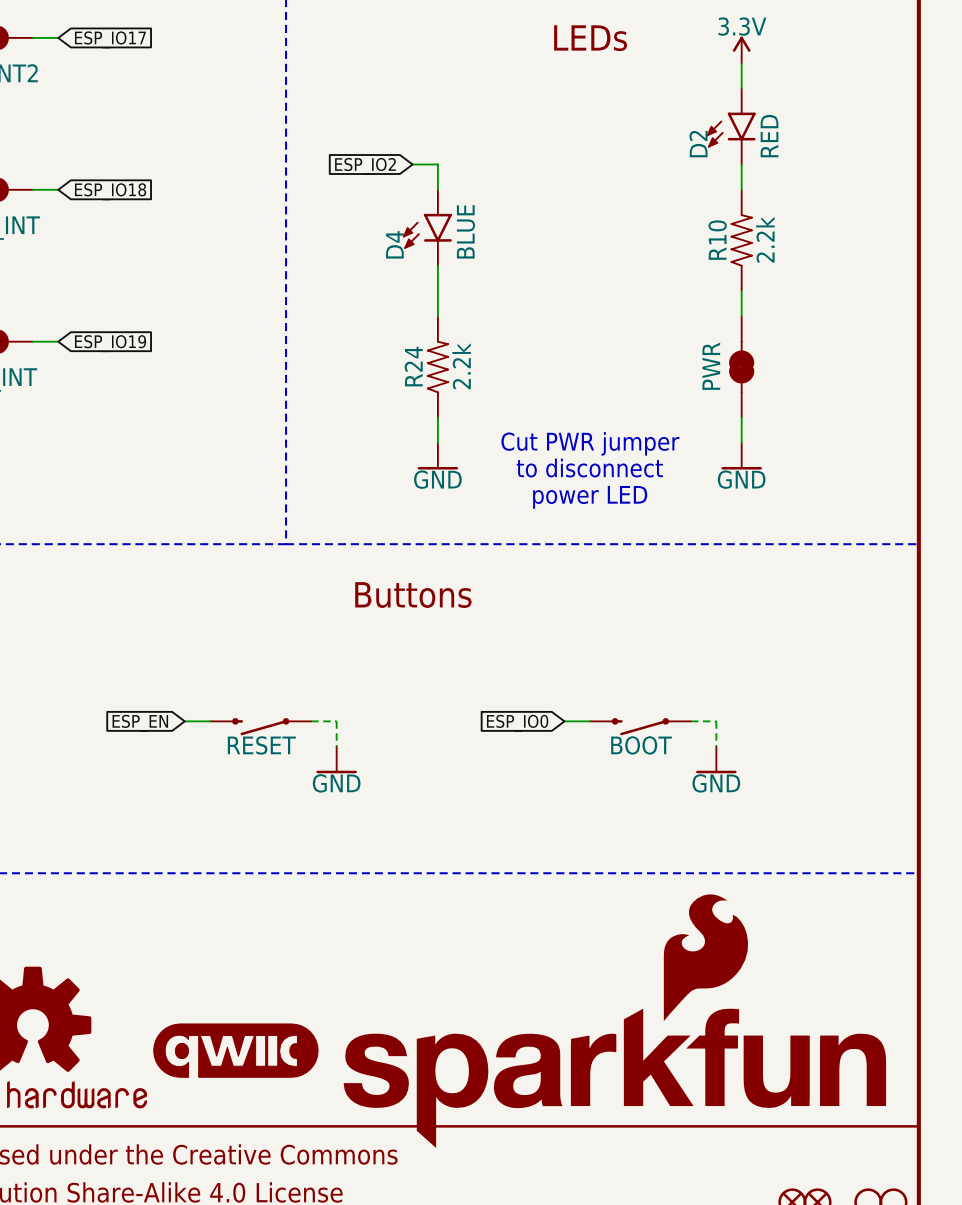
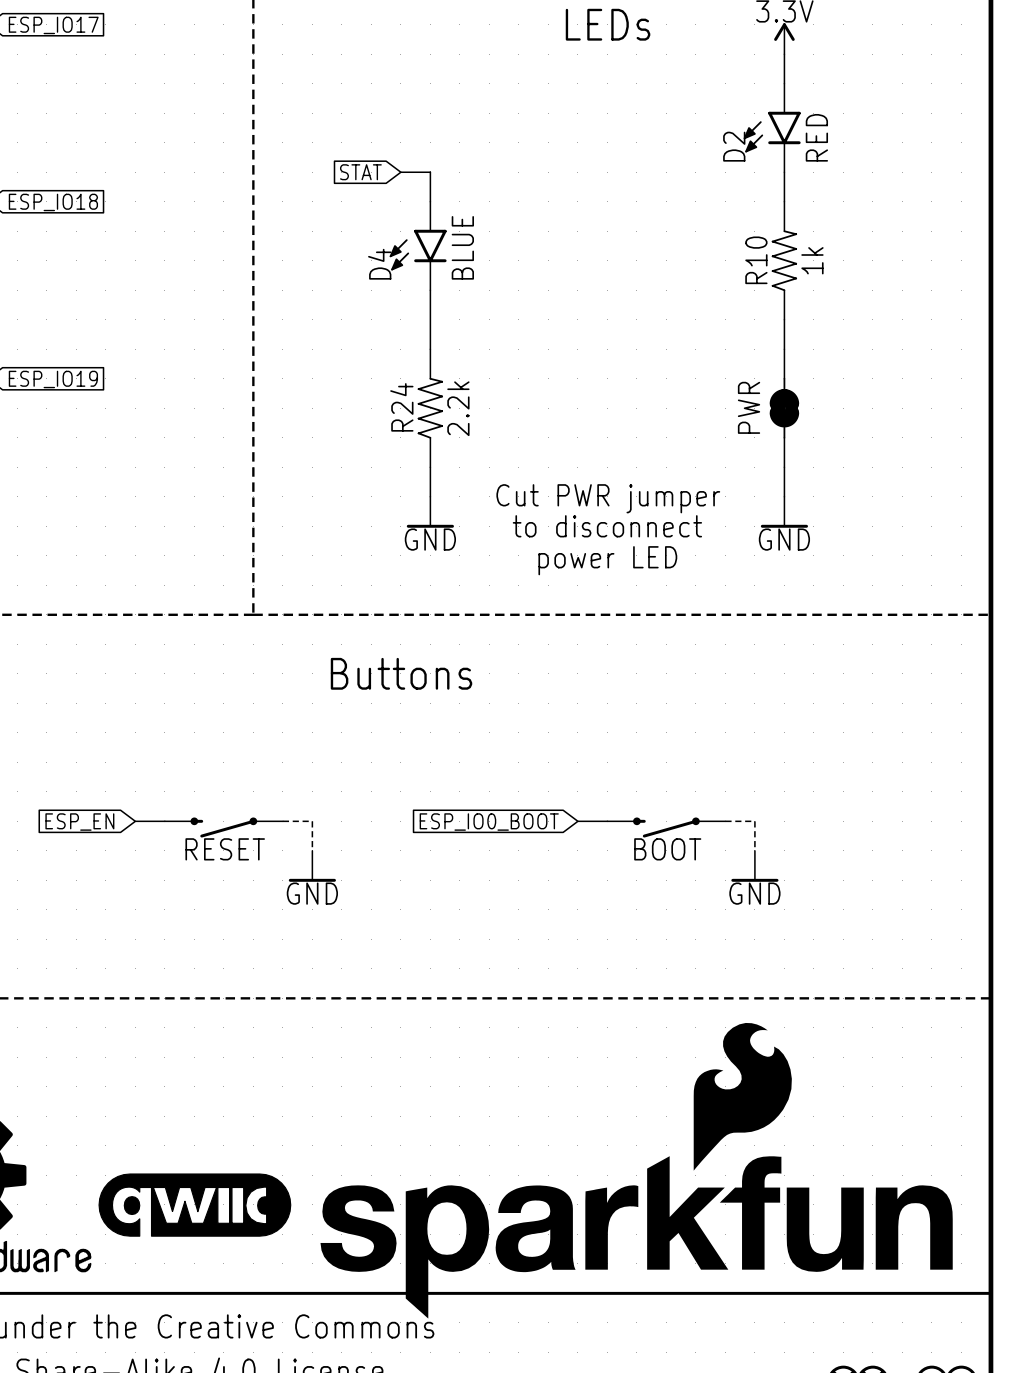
global label: ESP_IO2 (365, 166) -> STAT (360, 172)
R10 value: 2.2k (765, 239) -> 1k (812, 260)
global label: ESP_IO0 (517, 723) -> ESP_IO0_BOOT (489, 822)

